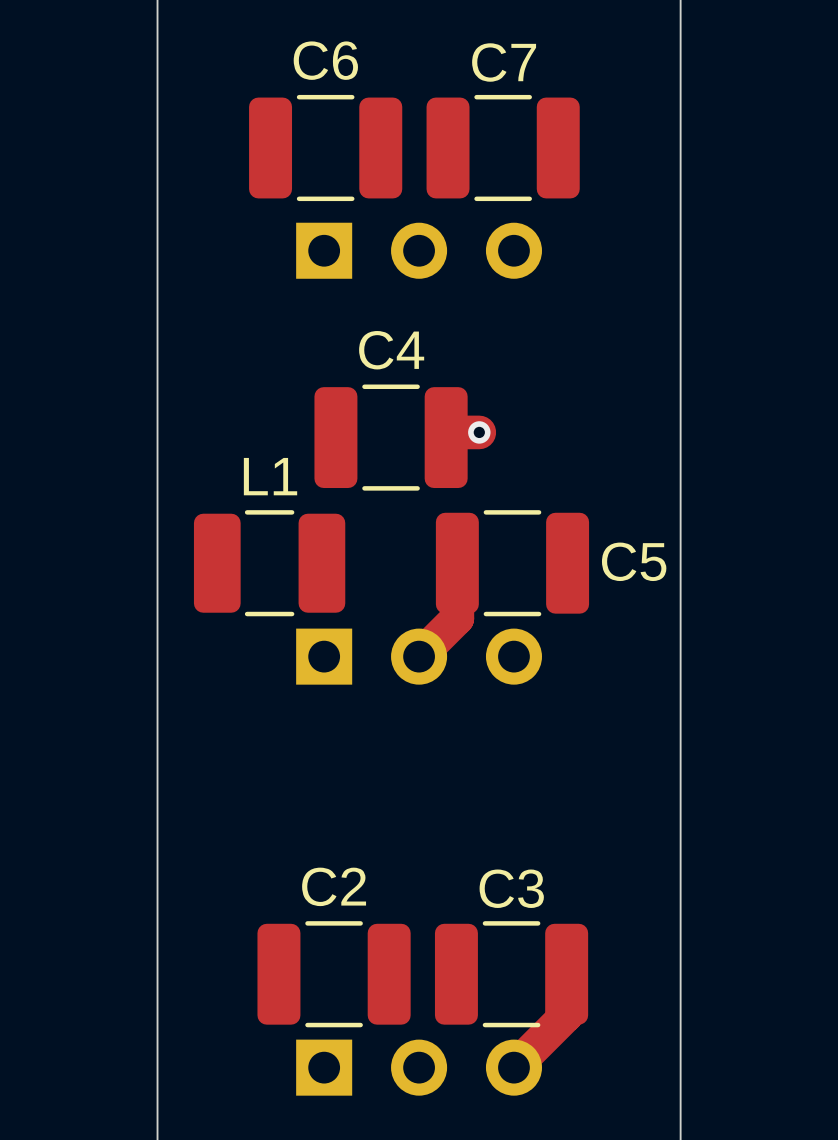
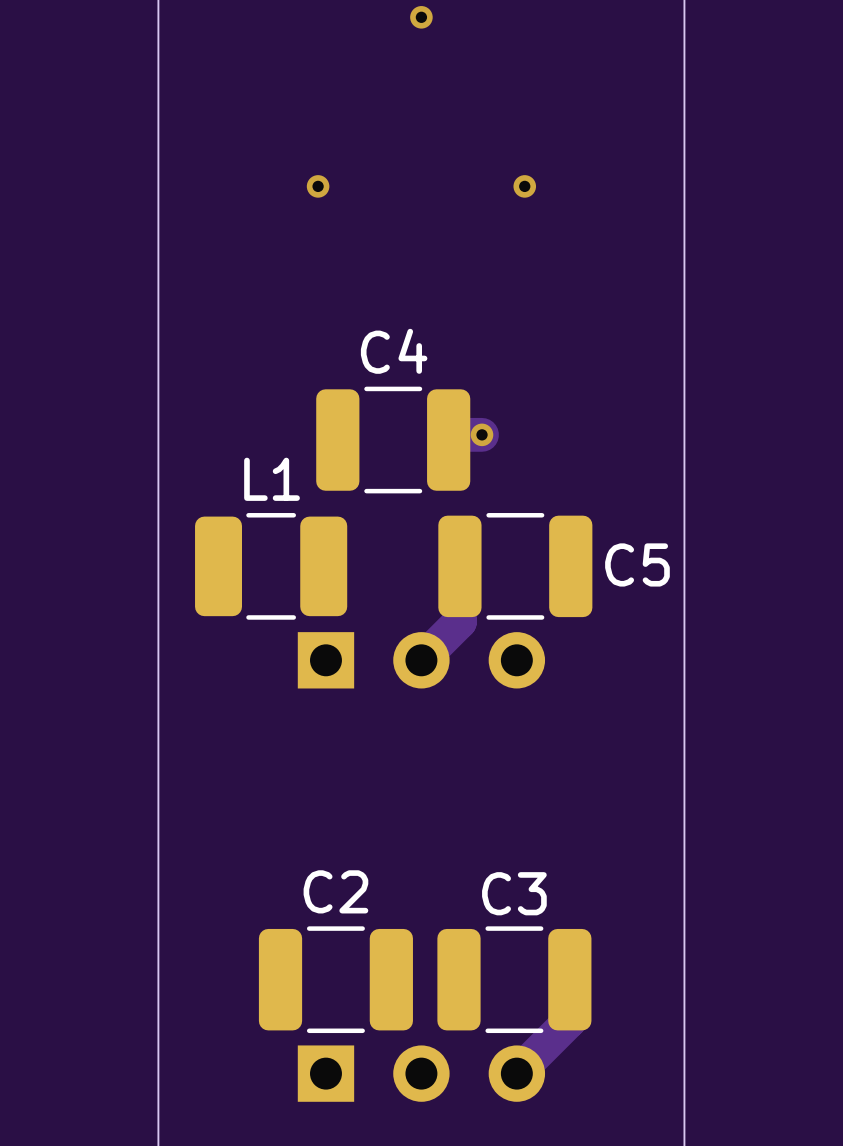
via: none -> (421, 17)
C6: (325, 148) -> none
C7: (503, 148) -> none
via: none -> (318, 186)
via: none -> (524, 186)
part: (419, 250) -> none

